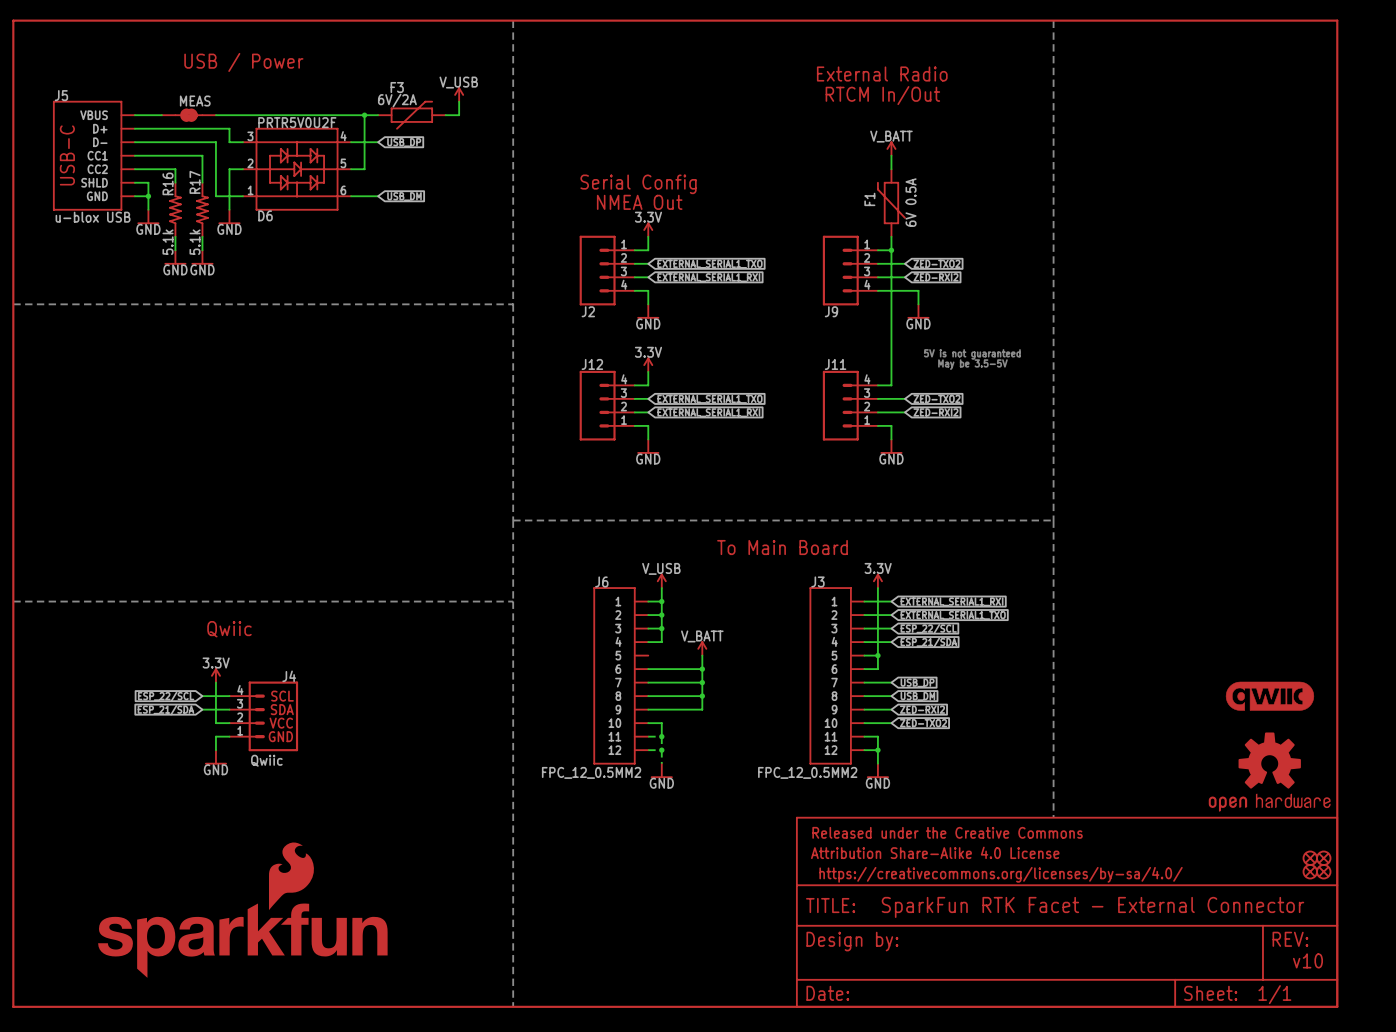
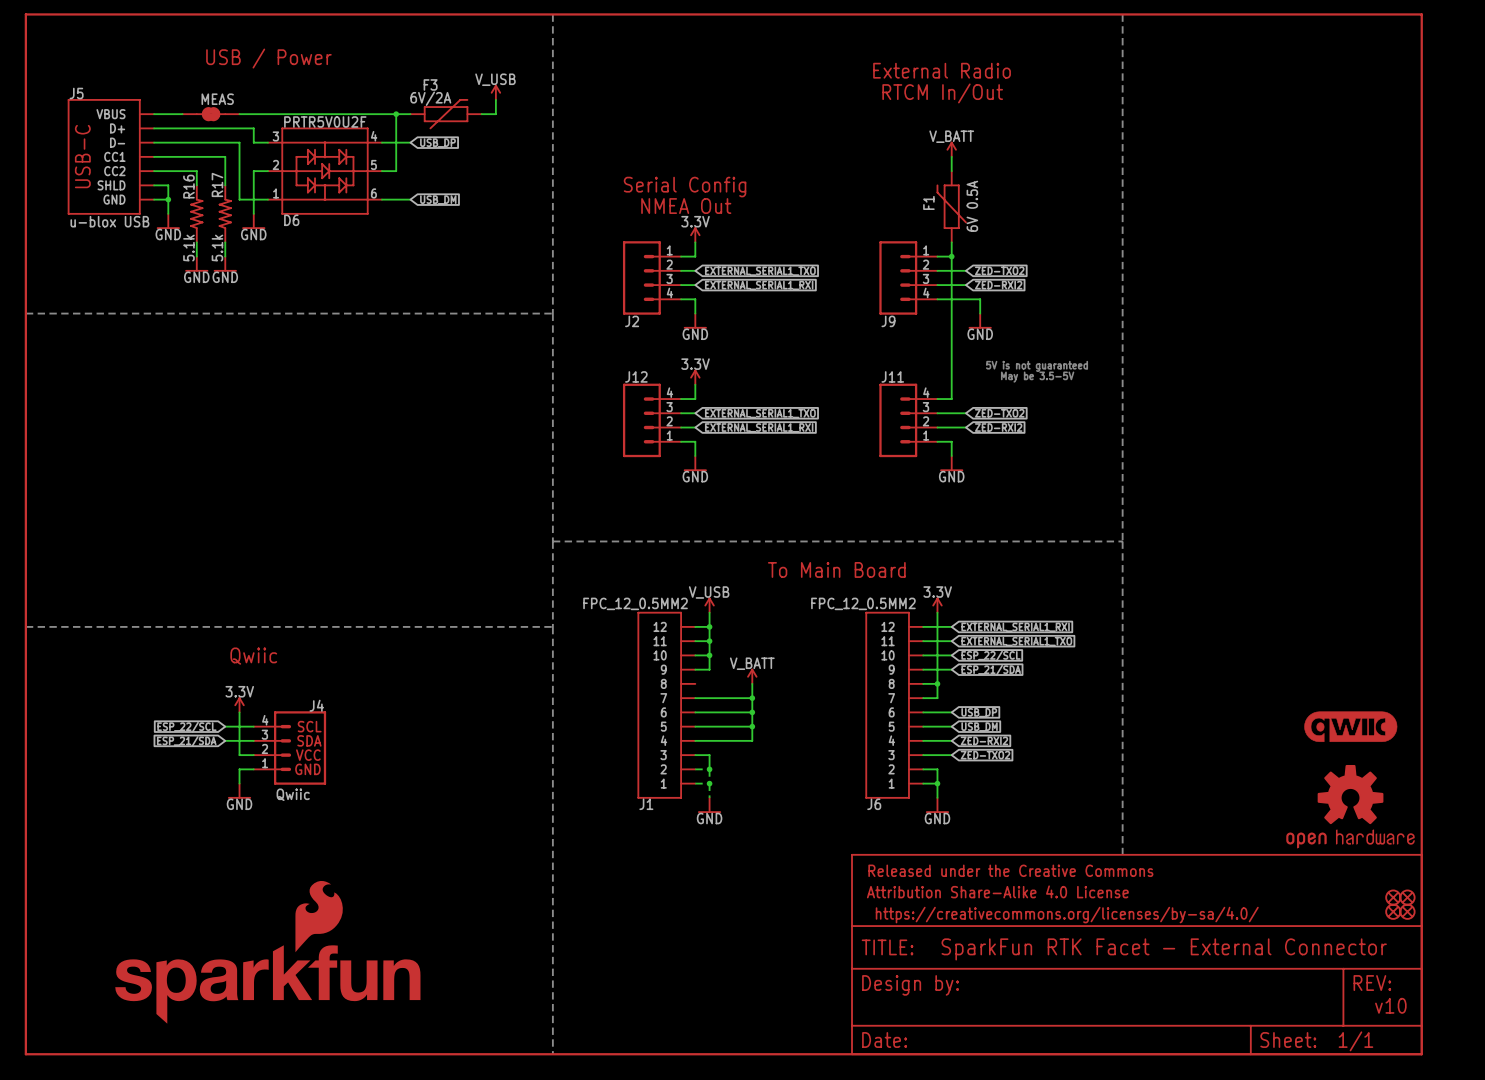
J6 flip: as is (614, 675) -> up-down (887, 705)
J6 position: (620, 675) -> (894, 705)
J1: none -> FPC_12_0.5MM2 (666, 705)
J3: FPC_12_0.5MM2 (837, 675) -> none

